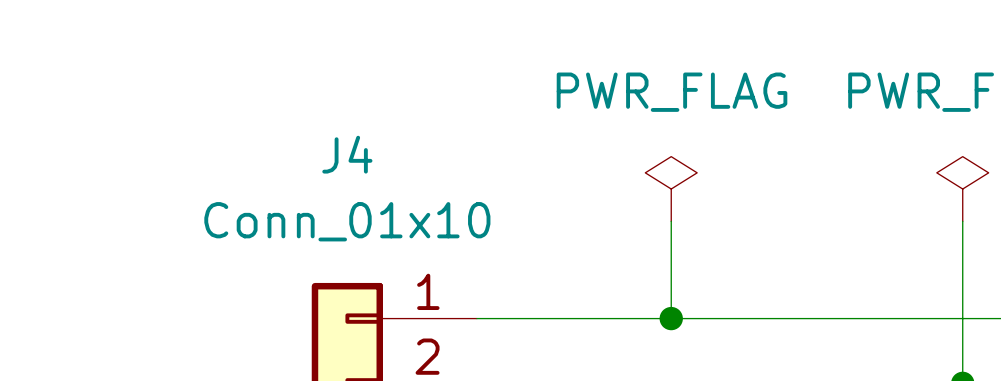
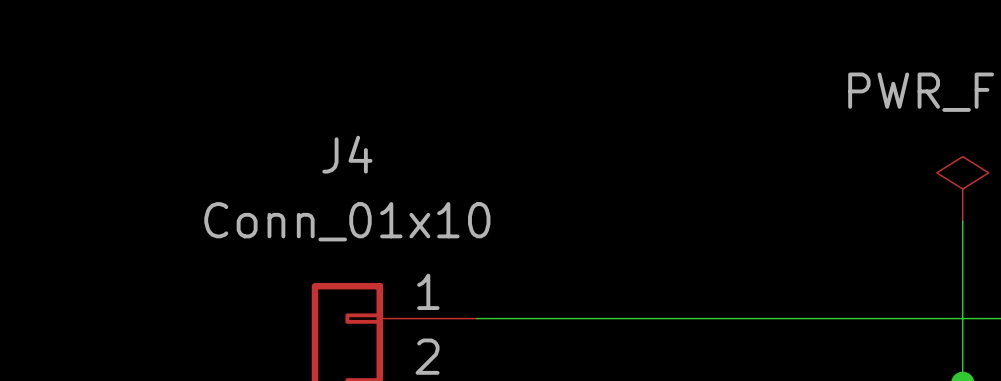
power symbol: PWR_FLAG (671, 189) -> none
wire: (671, 221) (671, 318) -> none
junction: (671, 318) -> none

